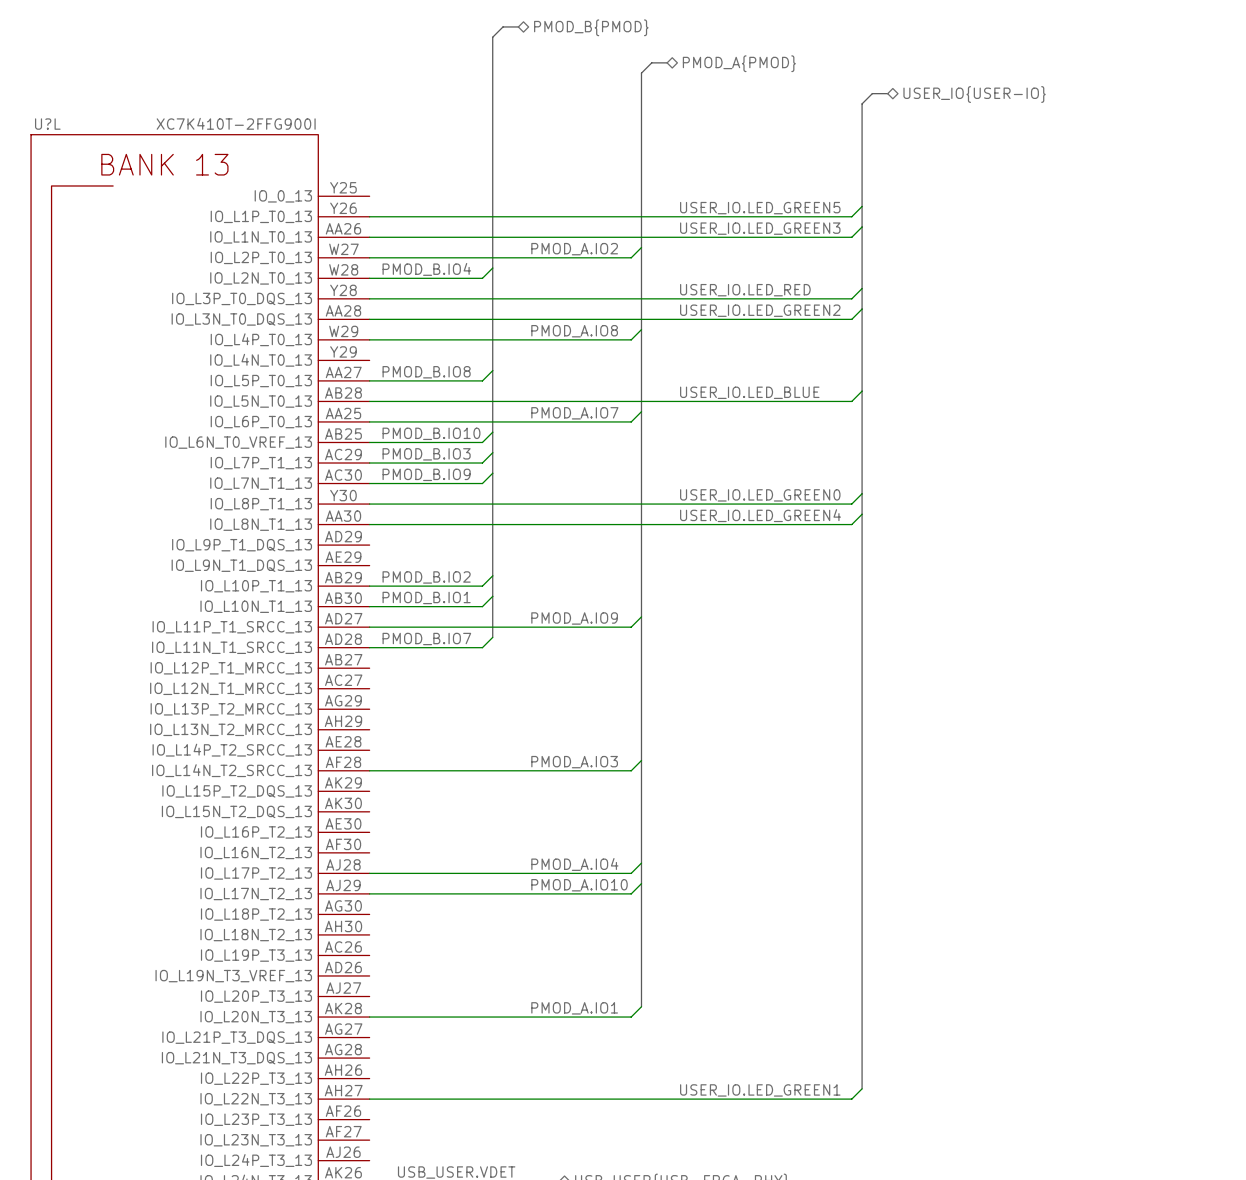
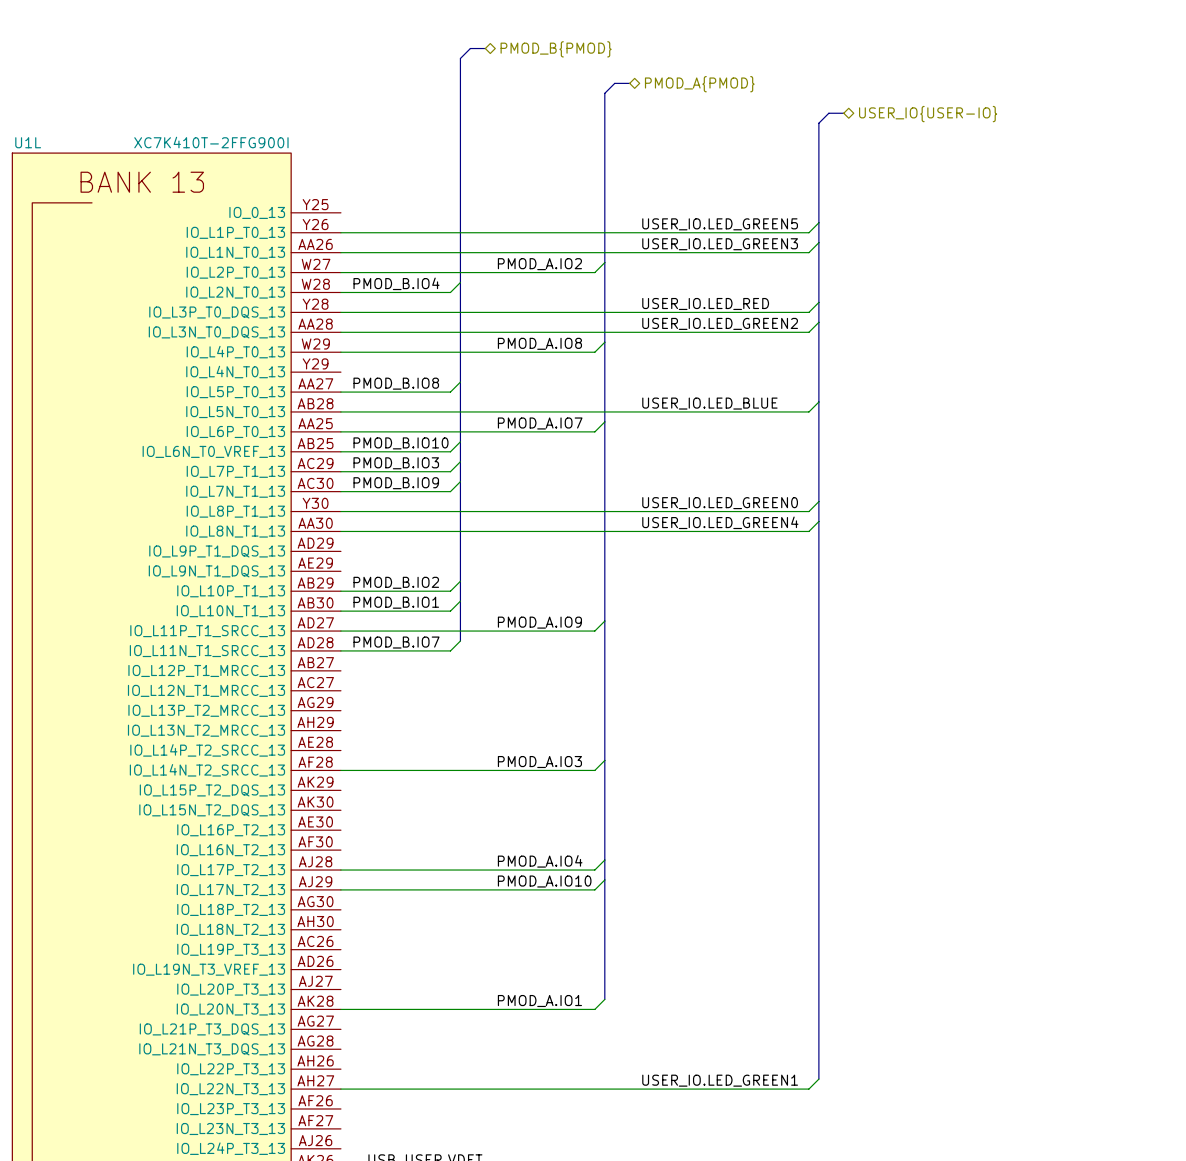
U?L name: U?L (47, 124) -> U1L (28, 142)

